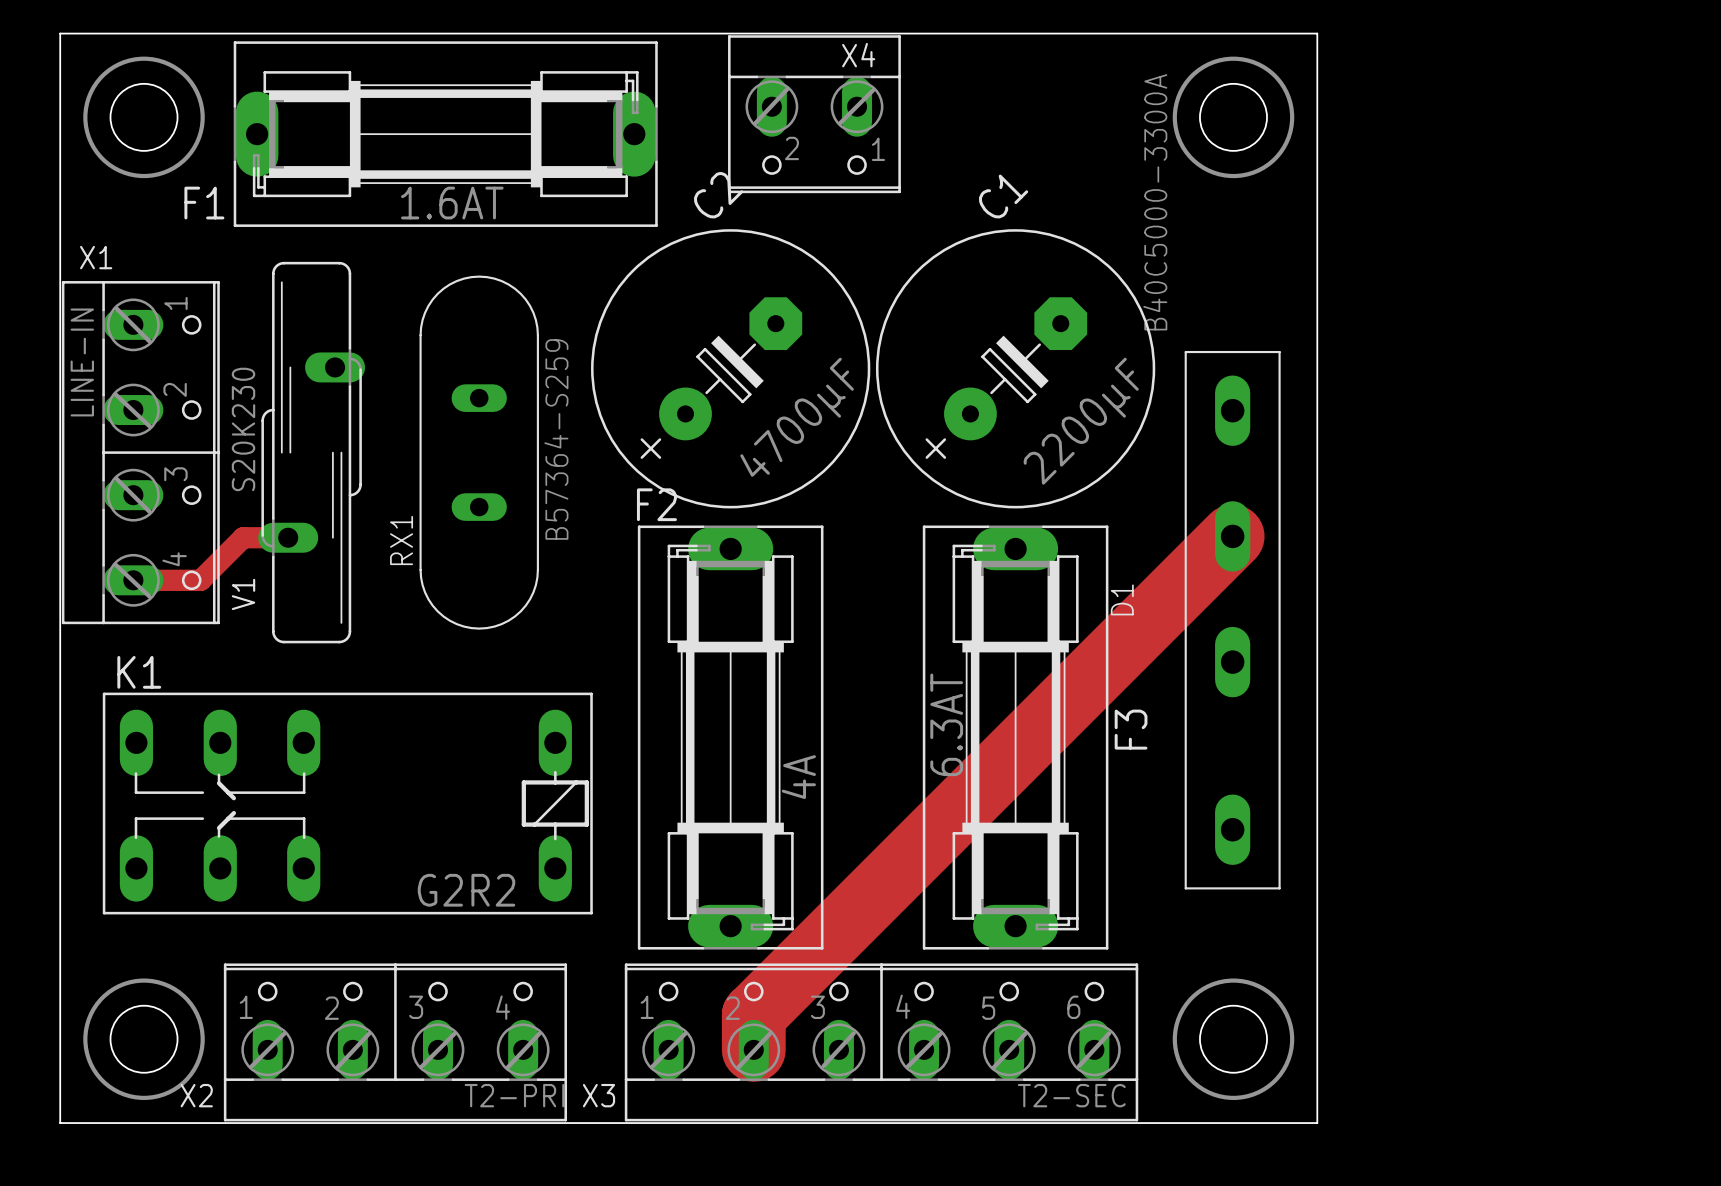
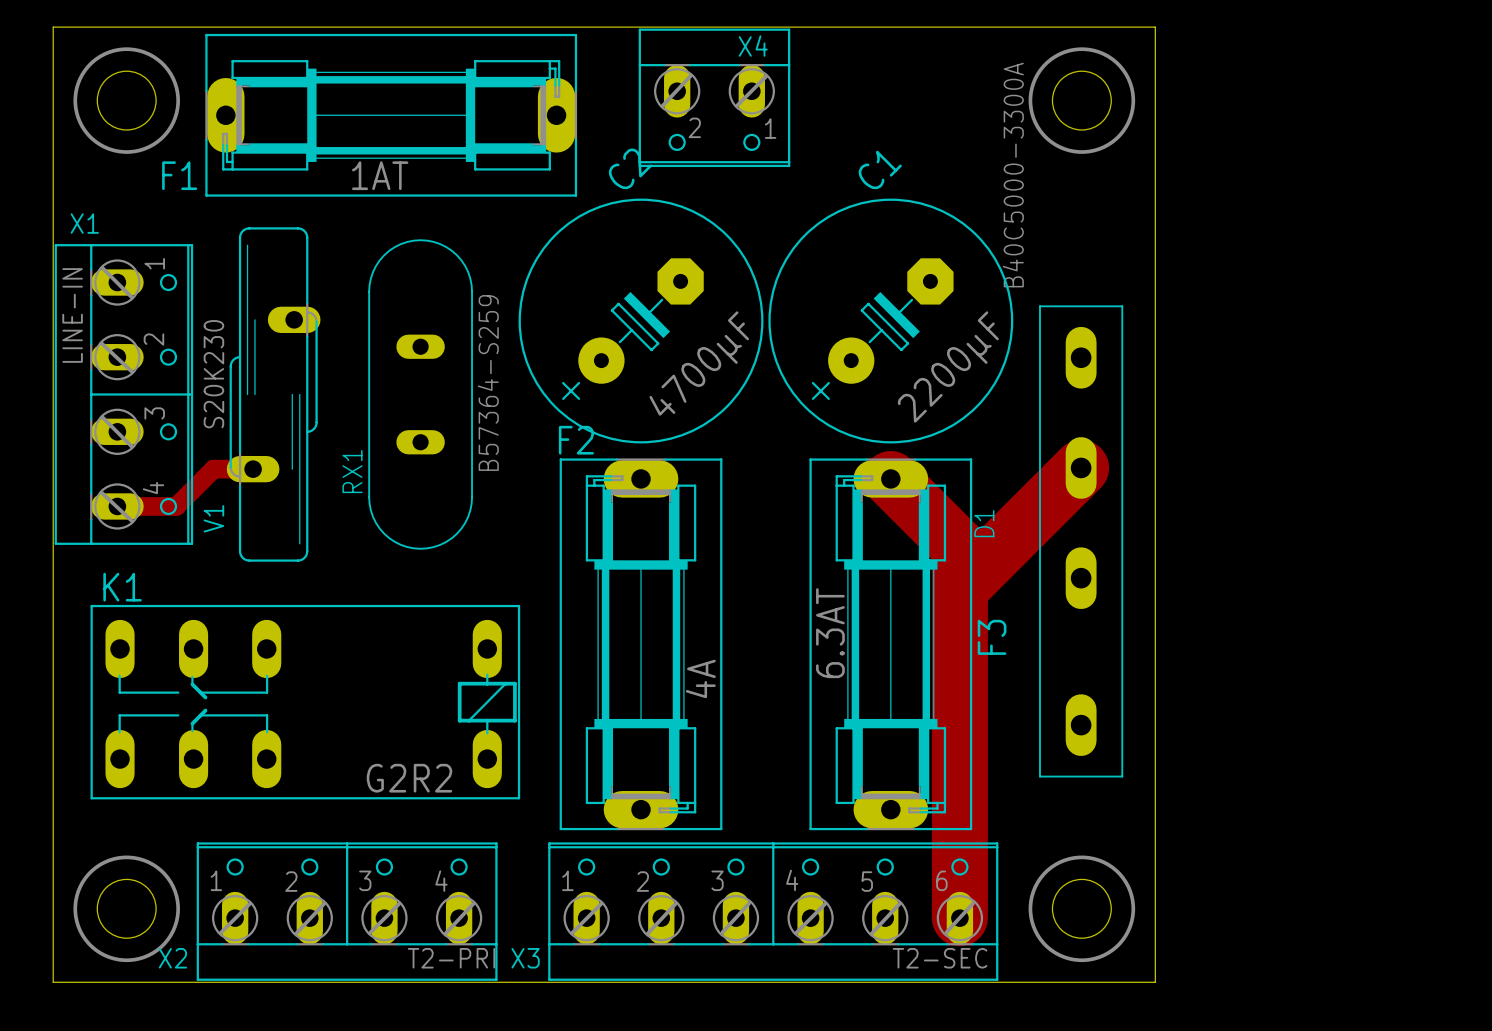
F1 value: 1.6AT (452, 203) -> 1AT (380, 175)
track: none -> (890, 478) (959, 548) (959, 918)
track: (1094, 674) (753, 1015) (753, 1049) -> none

